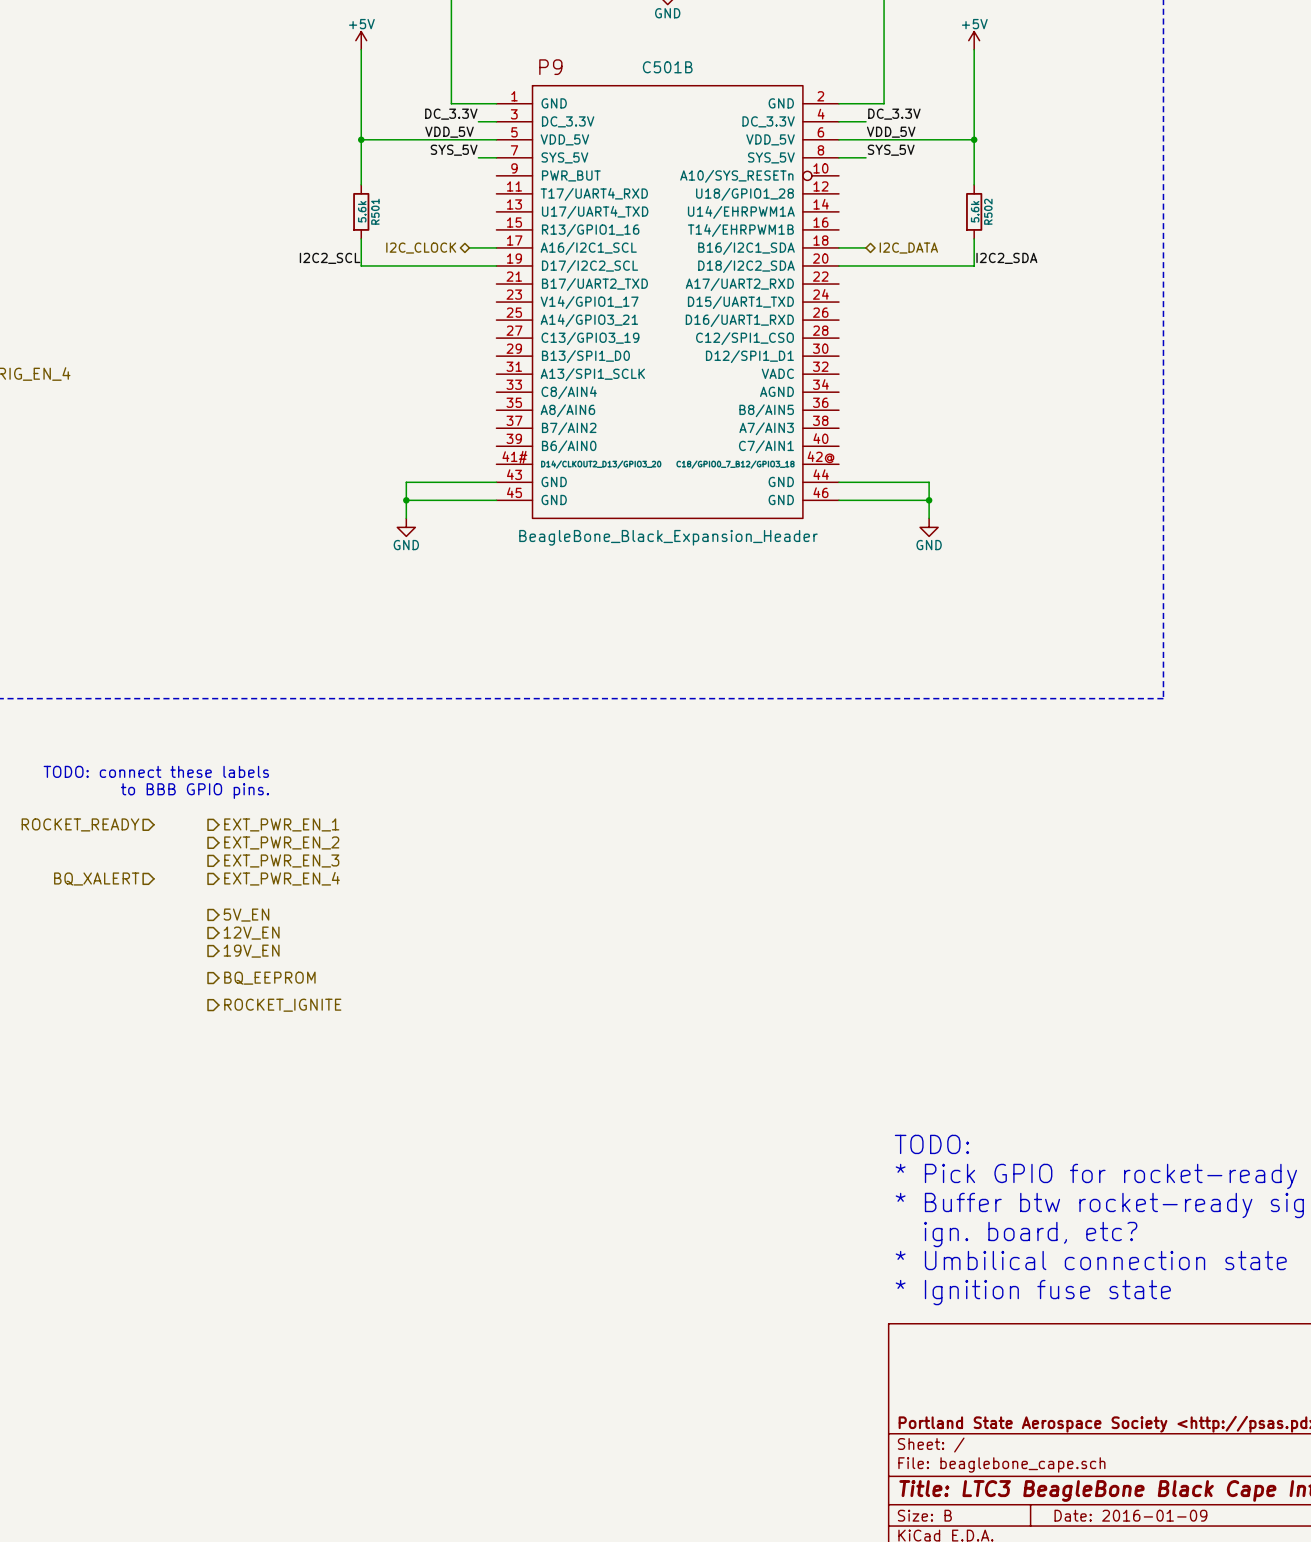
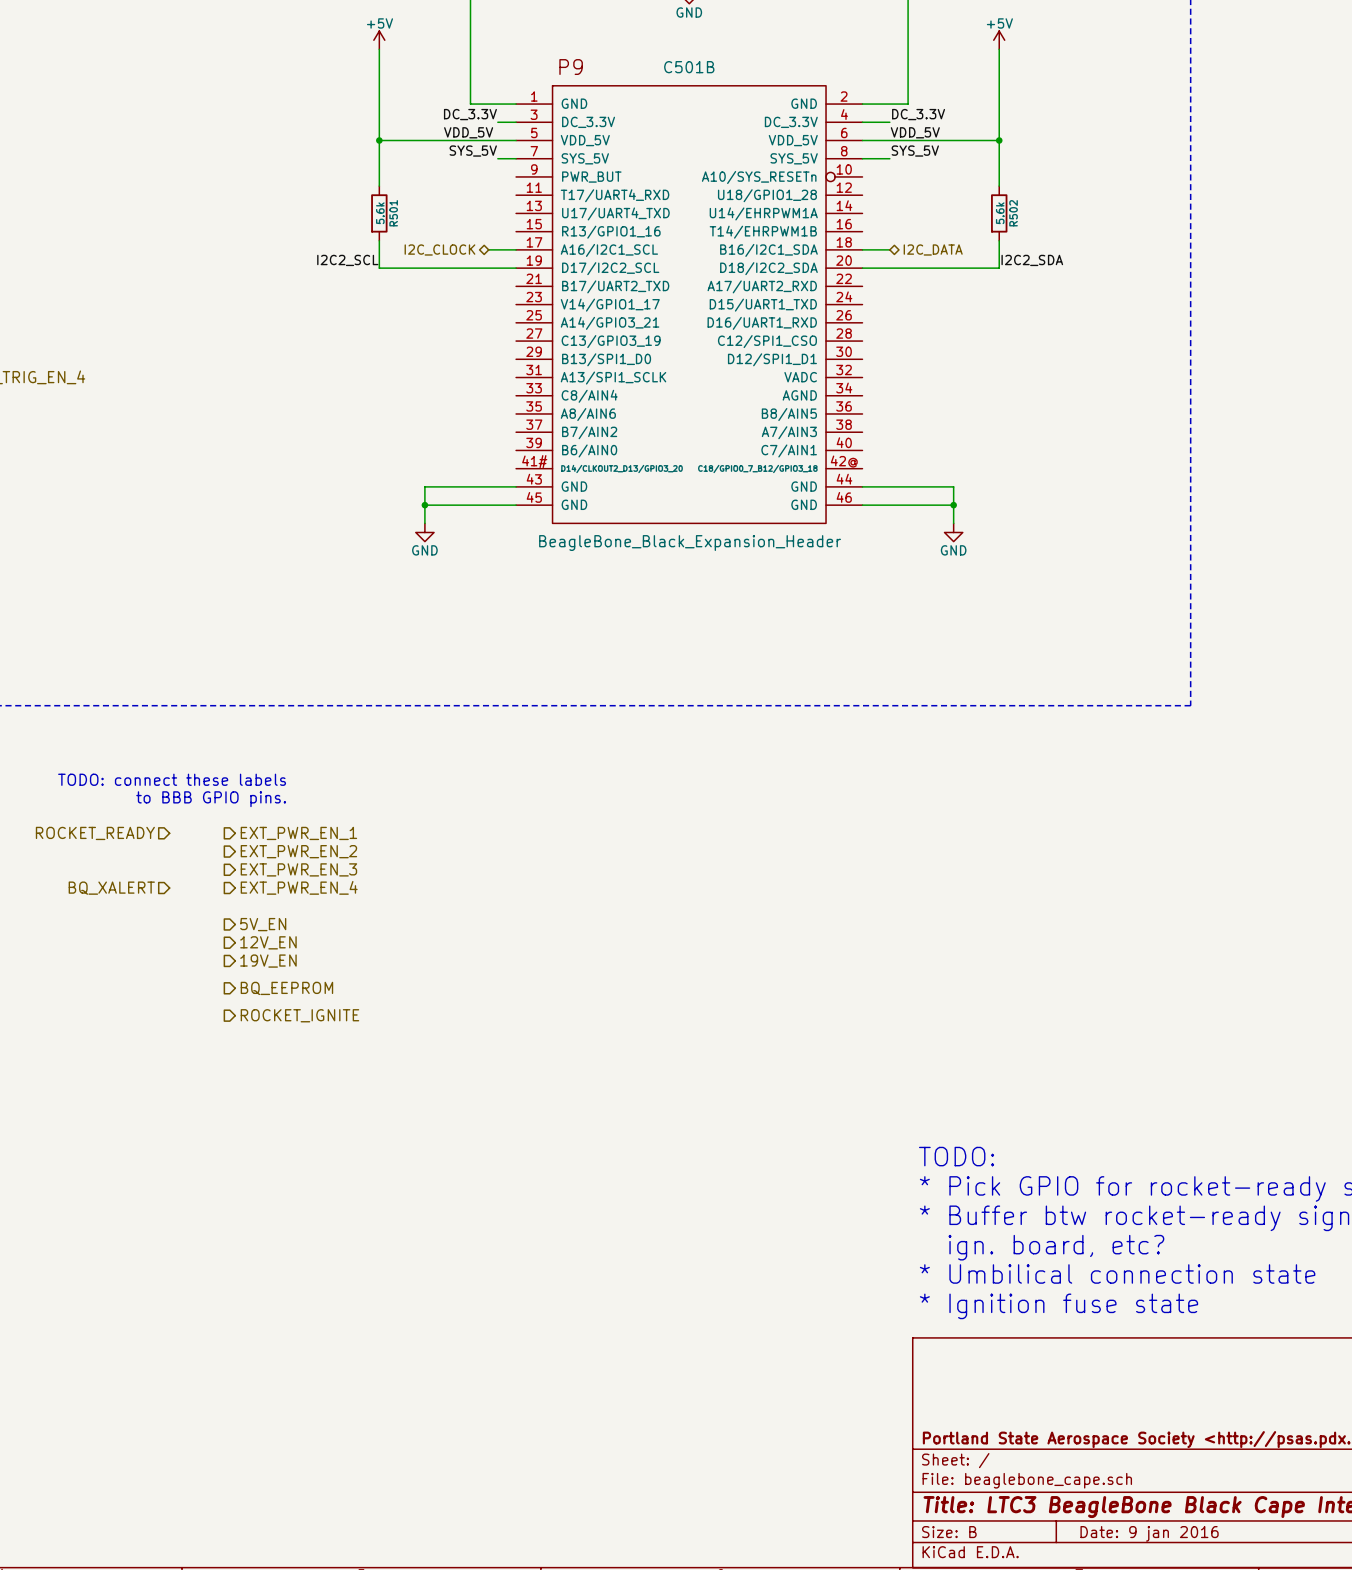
title block: Date: 2016-01-09 (1130, 1515) -> Date: 9 jan 2016 (1149, 1533)

